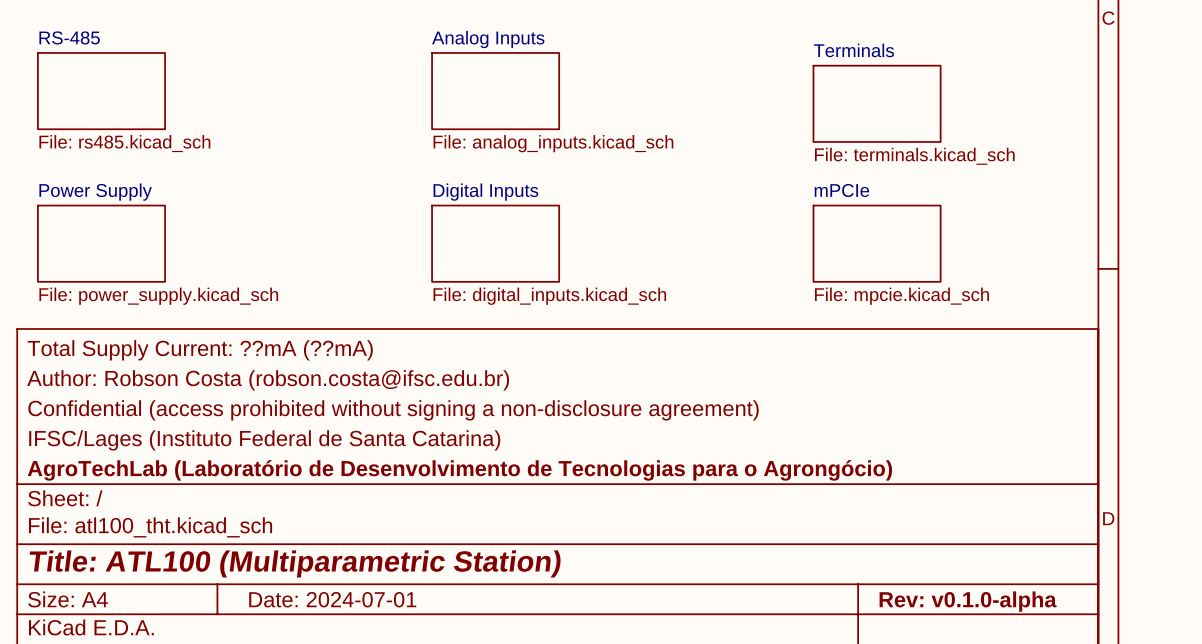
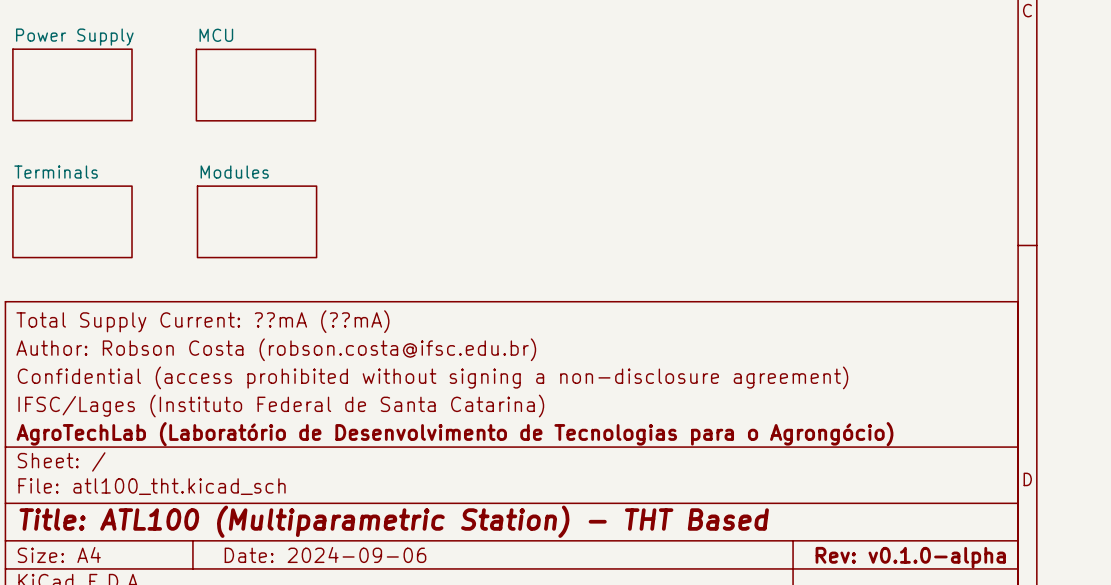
sheet RS-485: File: rs485.kicad_sch (101, 91) -> none
sheet Analog Inputs: File: analog_inputs.kicad_sch (495, 91) -> none
sheet Power Supply: none -> (72, 84)
sheet MCU: none -> (255, 85)
sheet Terminals: File: terminals.kicad_sch (877, 103) -> none
sheet Terminals: none -> (72, 221)
sheet Power Supply: File: power_supply.kicad_sch (101, 243) -> none
sheet Modules: none -> (257, 221)
sheet Digital Inputs: File: digital_inputs.kicad_sch (495, 243) -> none
sheet mPCIe: File: mpcie.kicad_sch (877, 243) -> none
title block: Title: ATL100 (Multiparametric Station) (295, 563) -> Title: ATL100 (Multiparametric Station) - THT Based (394, 521)
title block: Date: 2024-07-01 (332, 599) -> Date: 2024-09-06 (325, 554)

